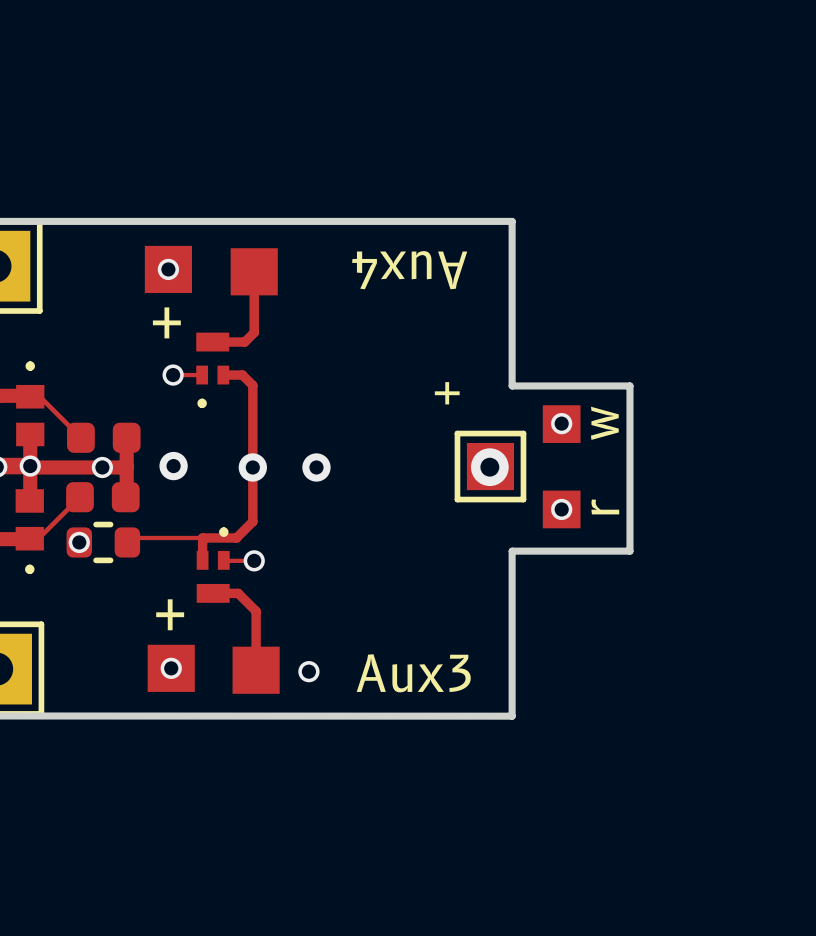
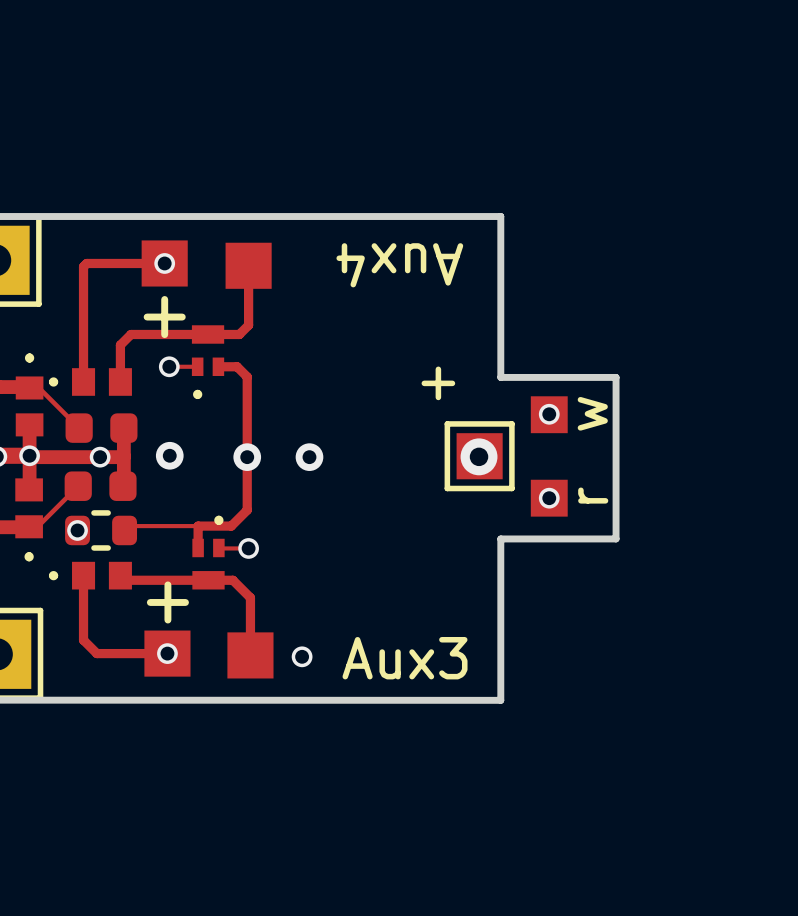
track: none -> (164, 263) (86, 263) (83, 266) (83, 381)
track: none -> (206, 334) (131, 334) (120, 345) (120, 381)
part: none -> (90, 381)
track: none -> (83, 575) (83, 640) (96, 653) (167, 653)
part: none -> (90, 575)
track: none -> (120, 575) (125, 580) (208, 580)

